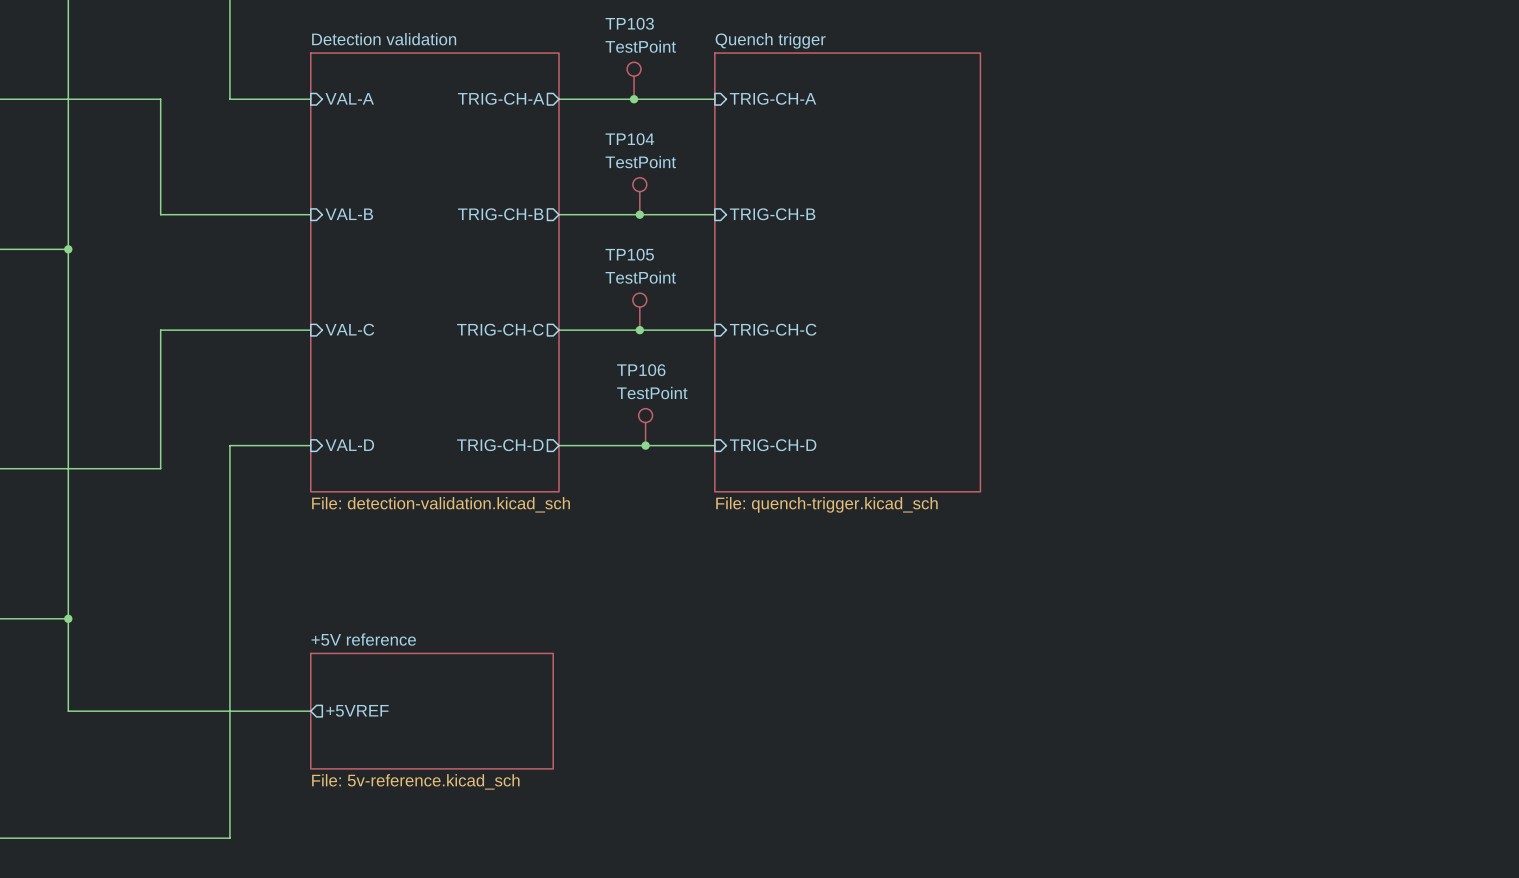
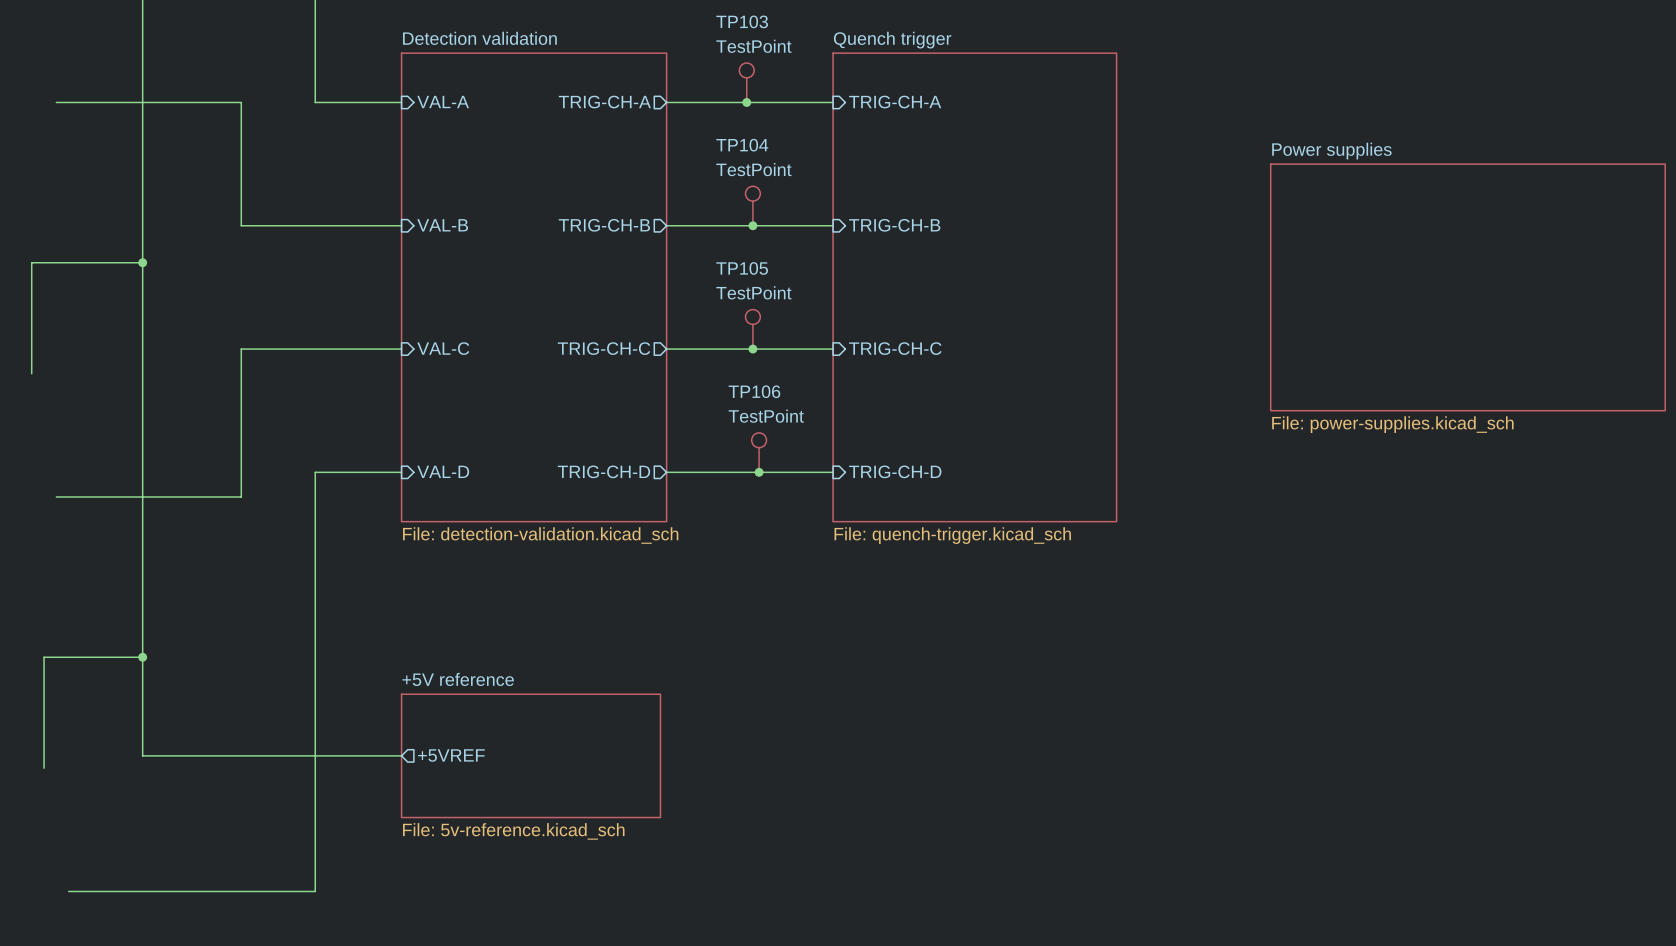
sheet Power supplies: none -> File: power-supplies.kicad_sch (1467, 287)

